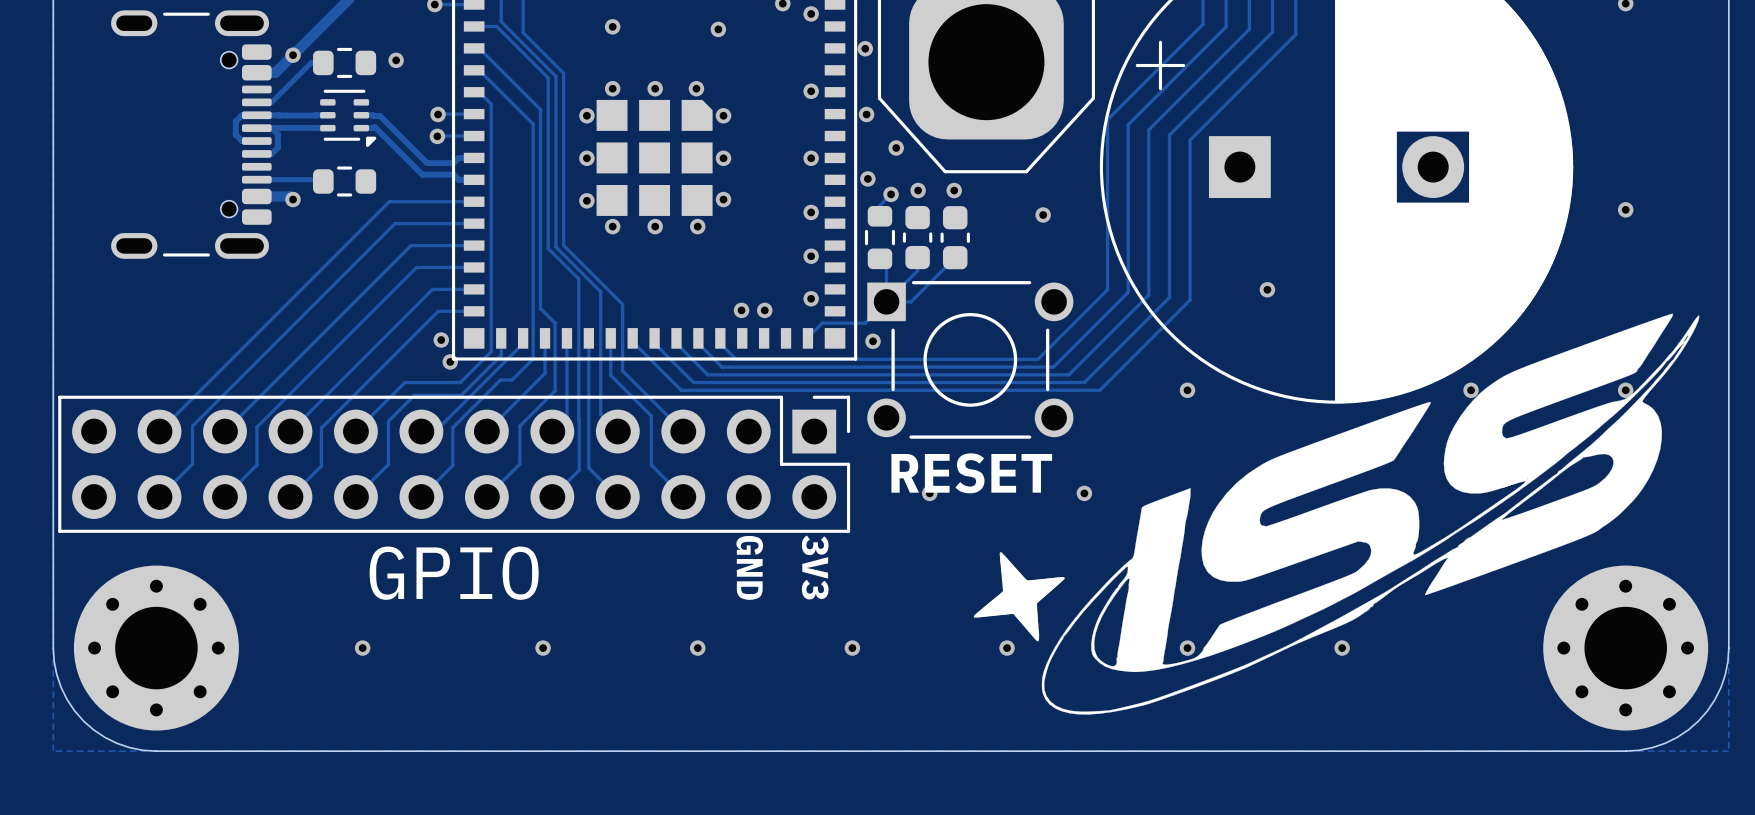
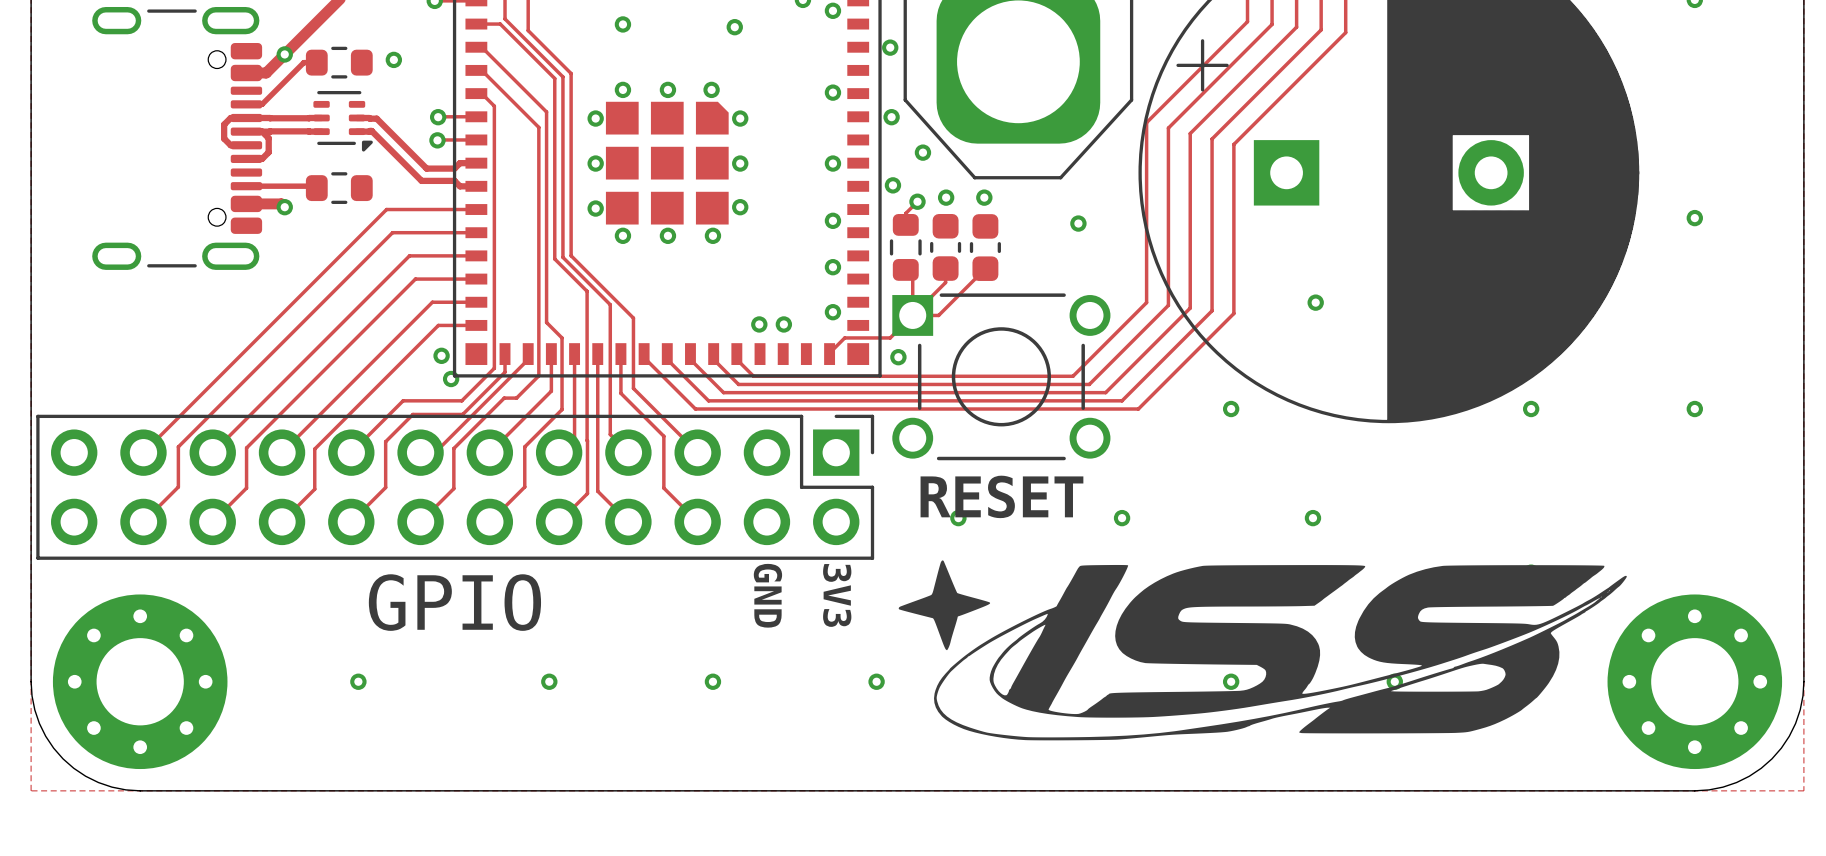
drawing: [973, 313, 1700, 715] -> none
drawing: none -> [898, 560, 1627, 741]

